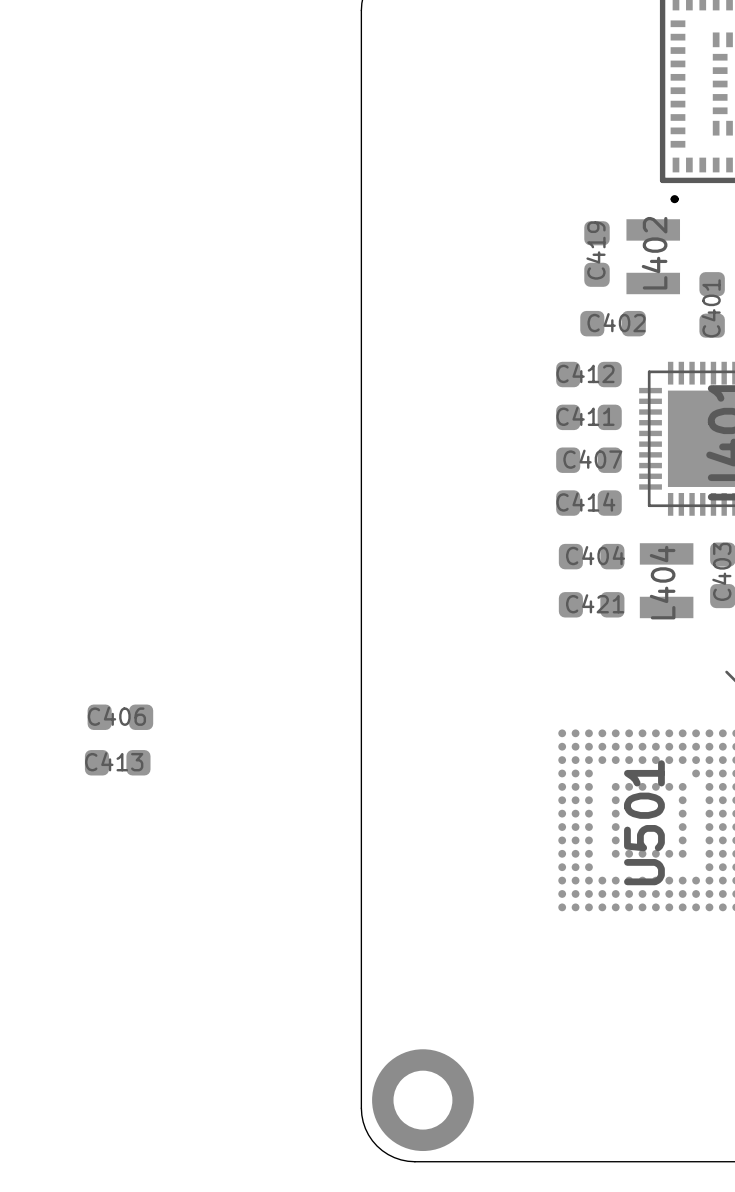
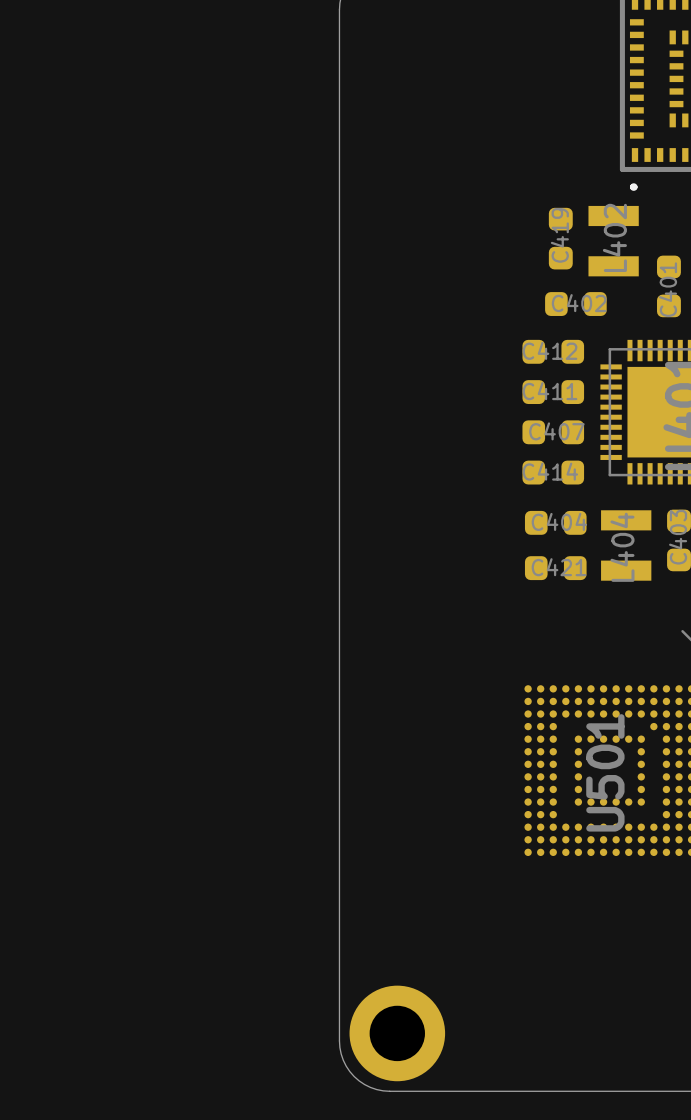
part: (120, 717) -> none
part: (117, 762) -> none

